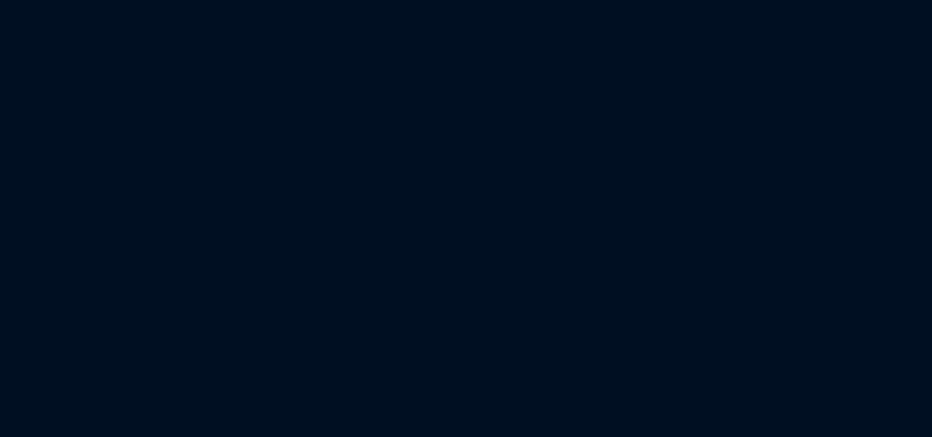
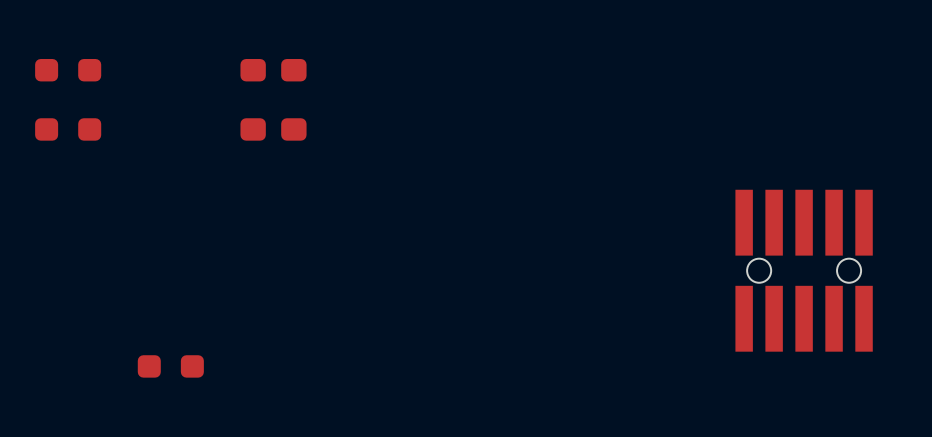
part: none -> (68, 70)
part: none -> (273, 70)
part: none -> (68, 129)
part: none -> (273, 129)
part: none -> (804, 270)
part: none -> (170, 366)

